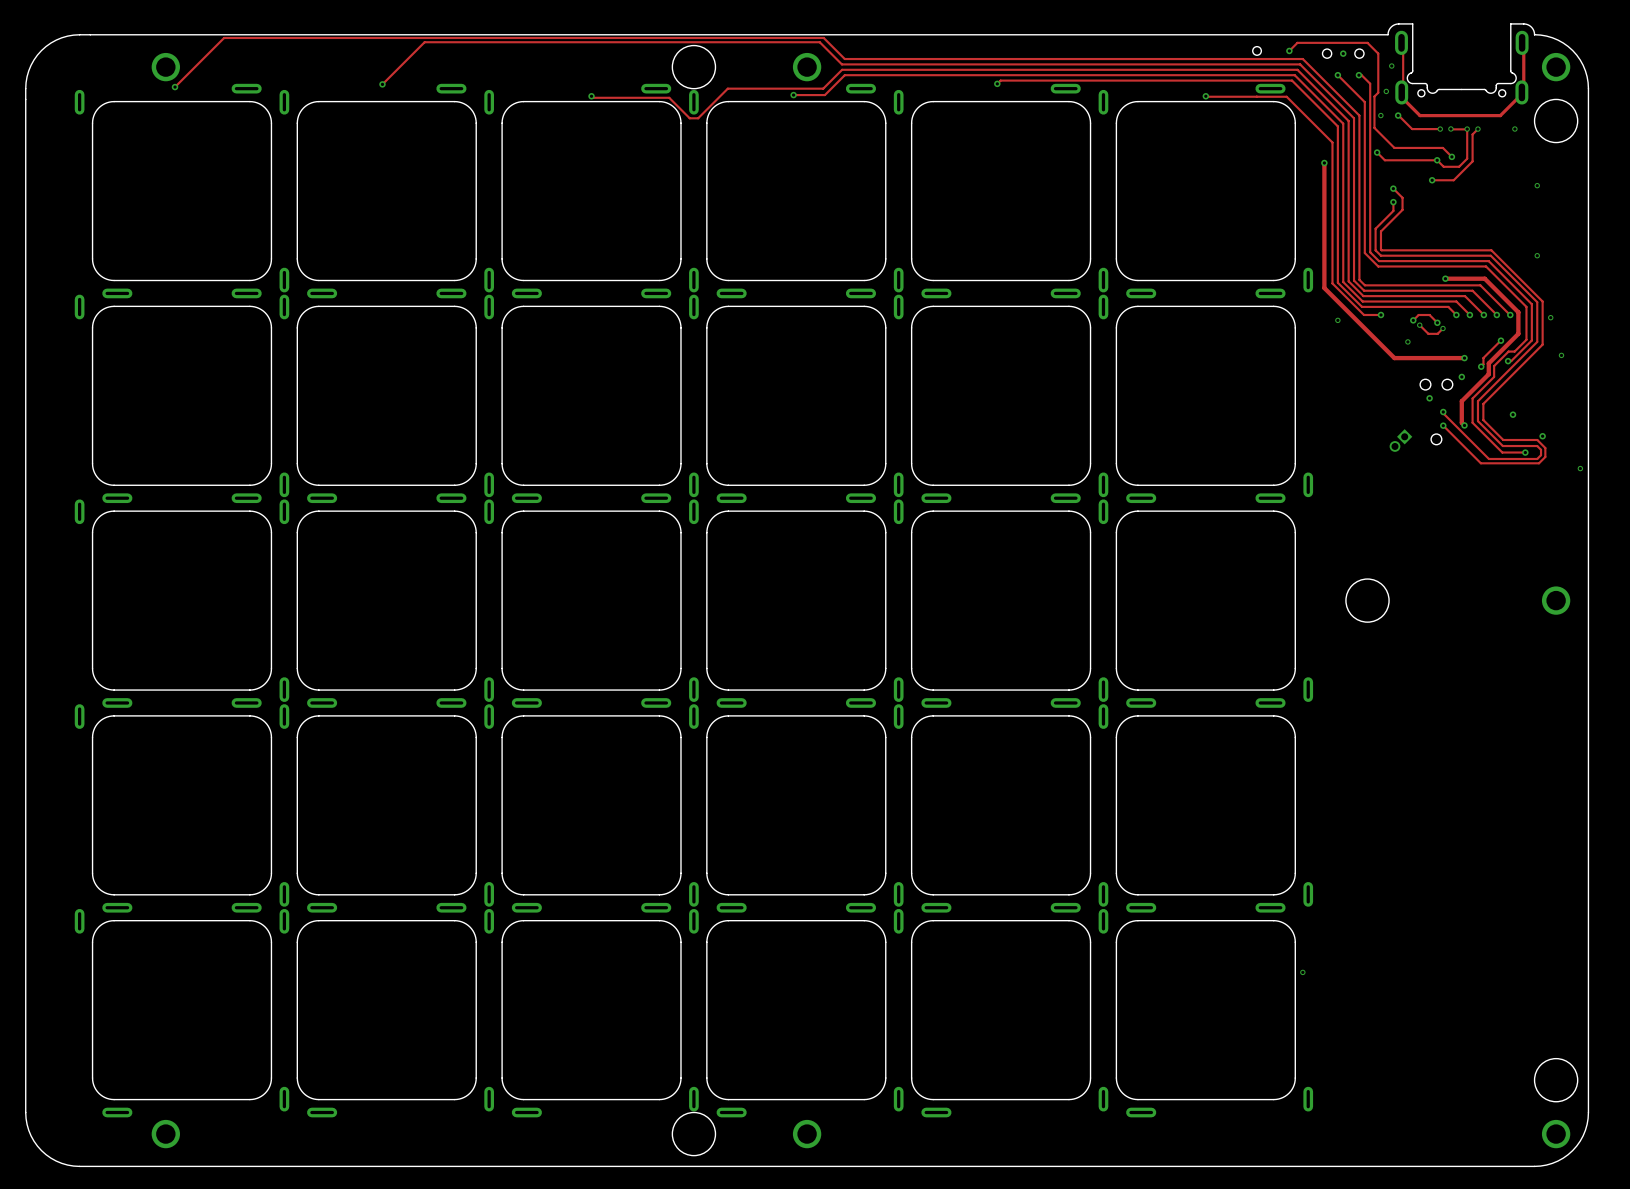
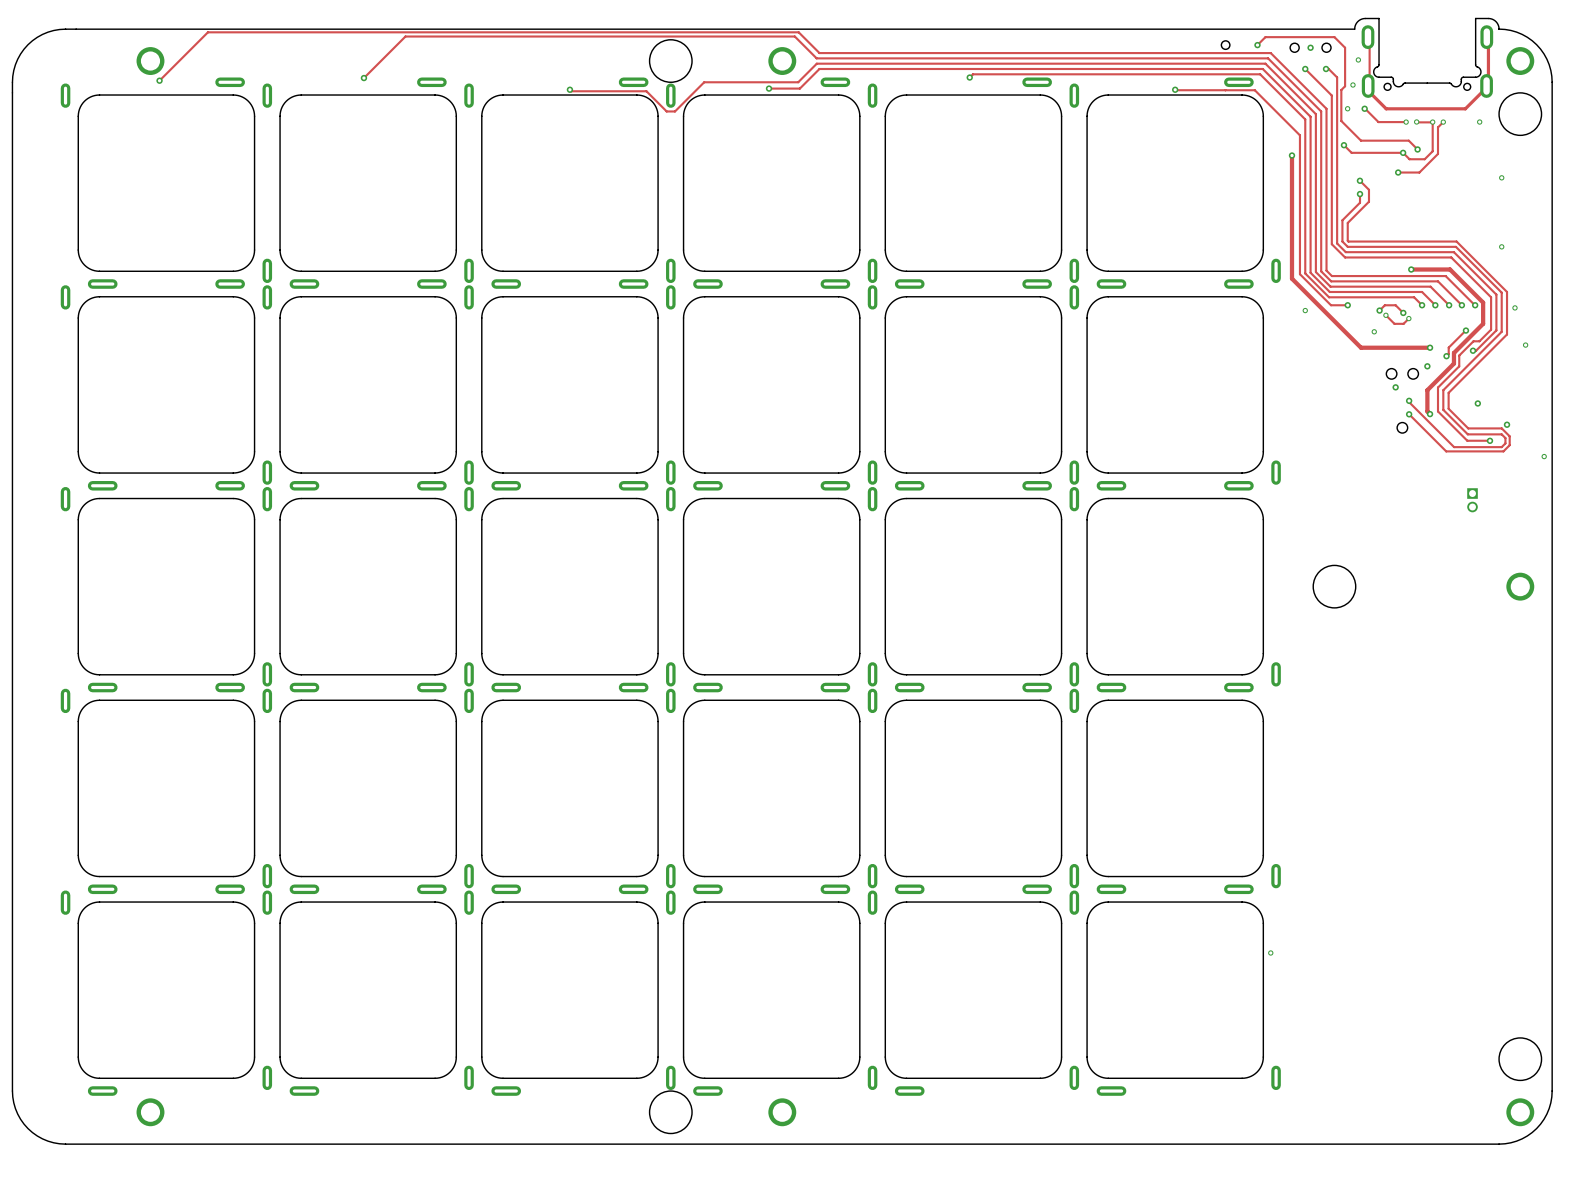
part: (1400, 440) -> none
part: none -> (1472, 500)

